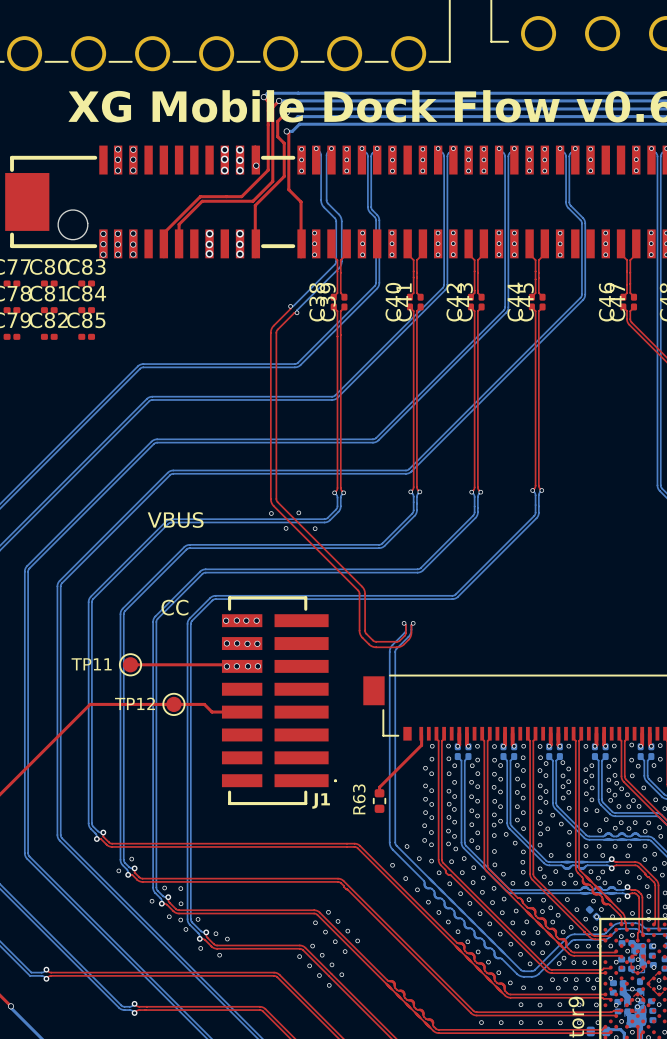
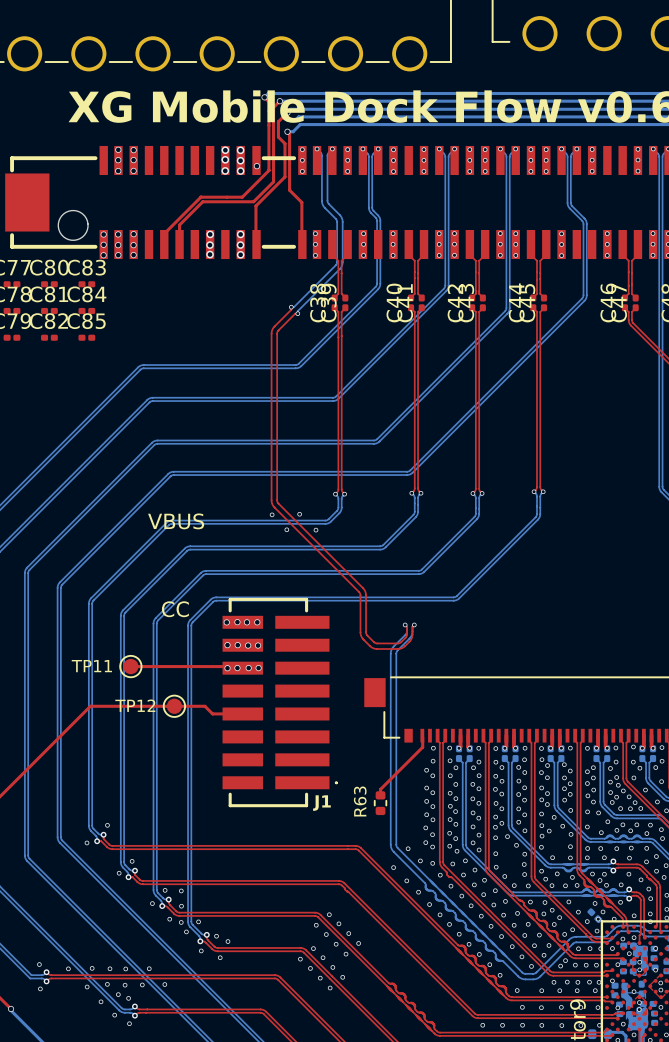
via: none -> (107, 825)
via: none -> (86, 842)
via: none -> (39, 964)
via: none -> (92, 968)
via: none -> (68, 968)
via: none -> (109, 968)
via: none -> (125, 968)
via: none -> (149, 968)
via: none -> (107, 984)
via: none -> (164, 984)
via: none -> (125, 985)
via: none -> (142, 984)
via: (510, 982) -> none
via: none -> (87, 986)
via: none -> (40, 988)
via: none -> (517, 990)
via: (523, 987) -> none
via: none -> (118, 994)
via: none -> (128, 998)
via: none -> (101, 1001)
via: none -> (114, 1015)
via: none -> (129, 1023)

